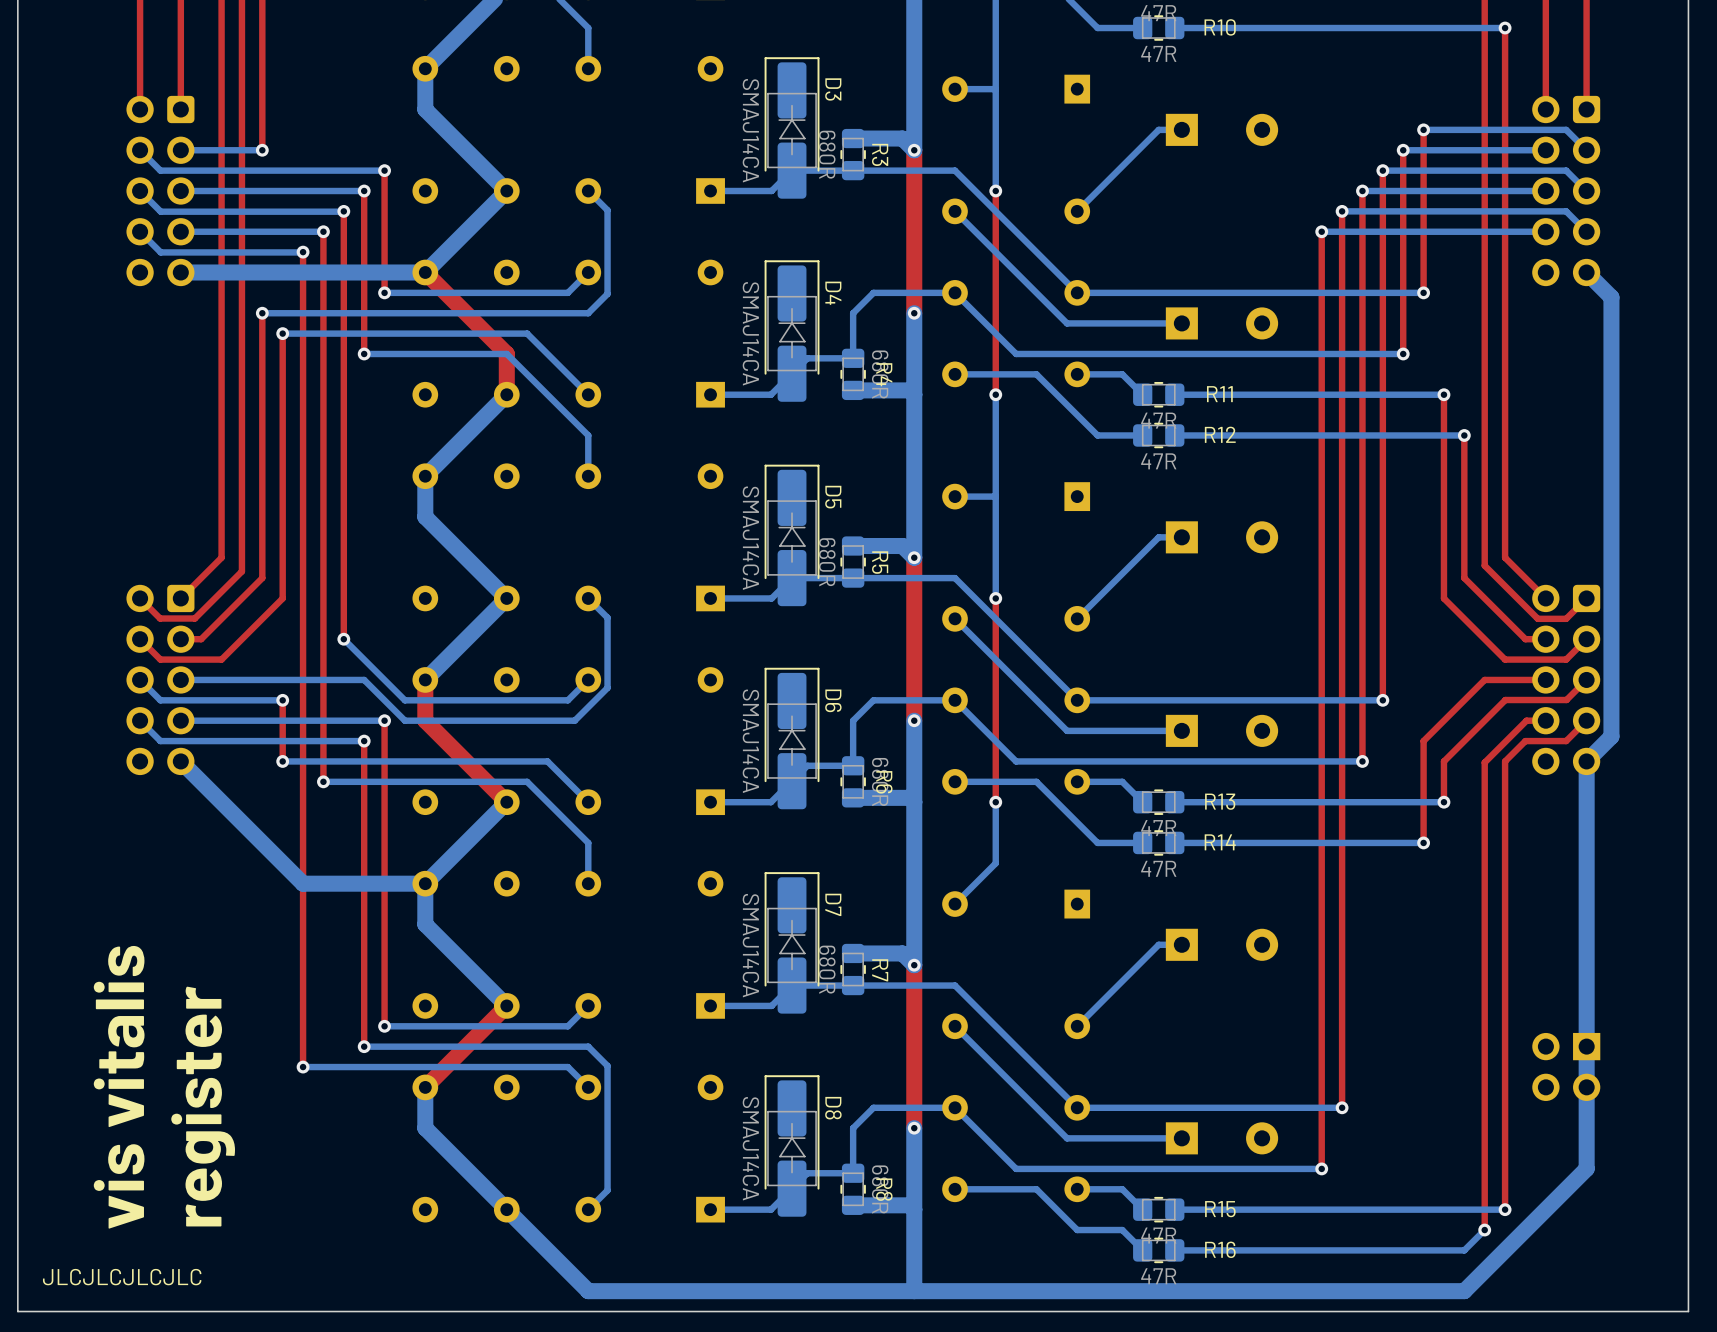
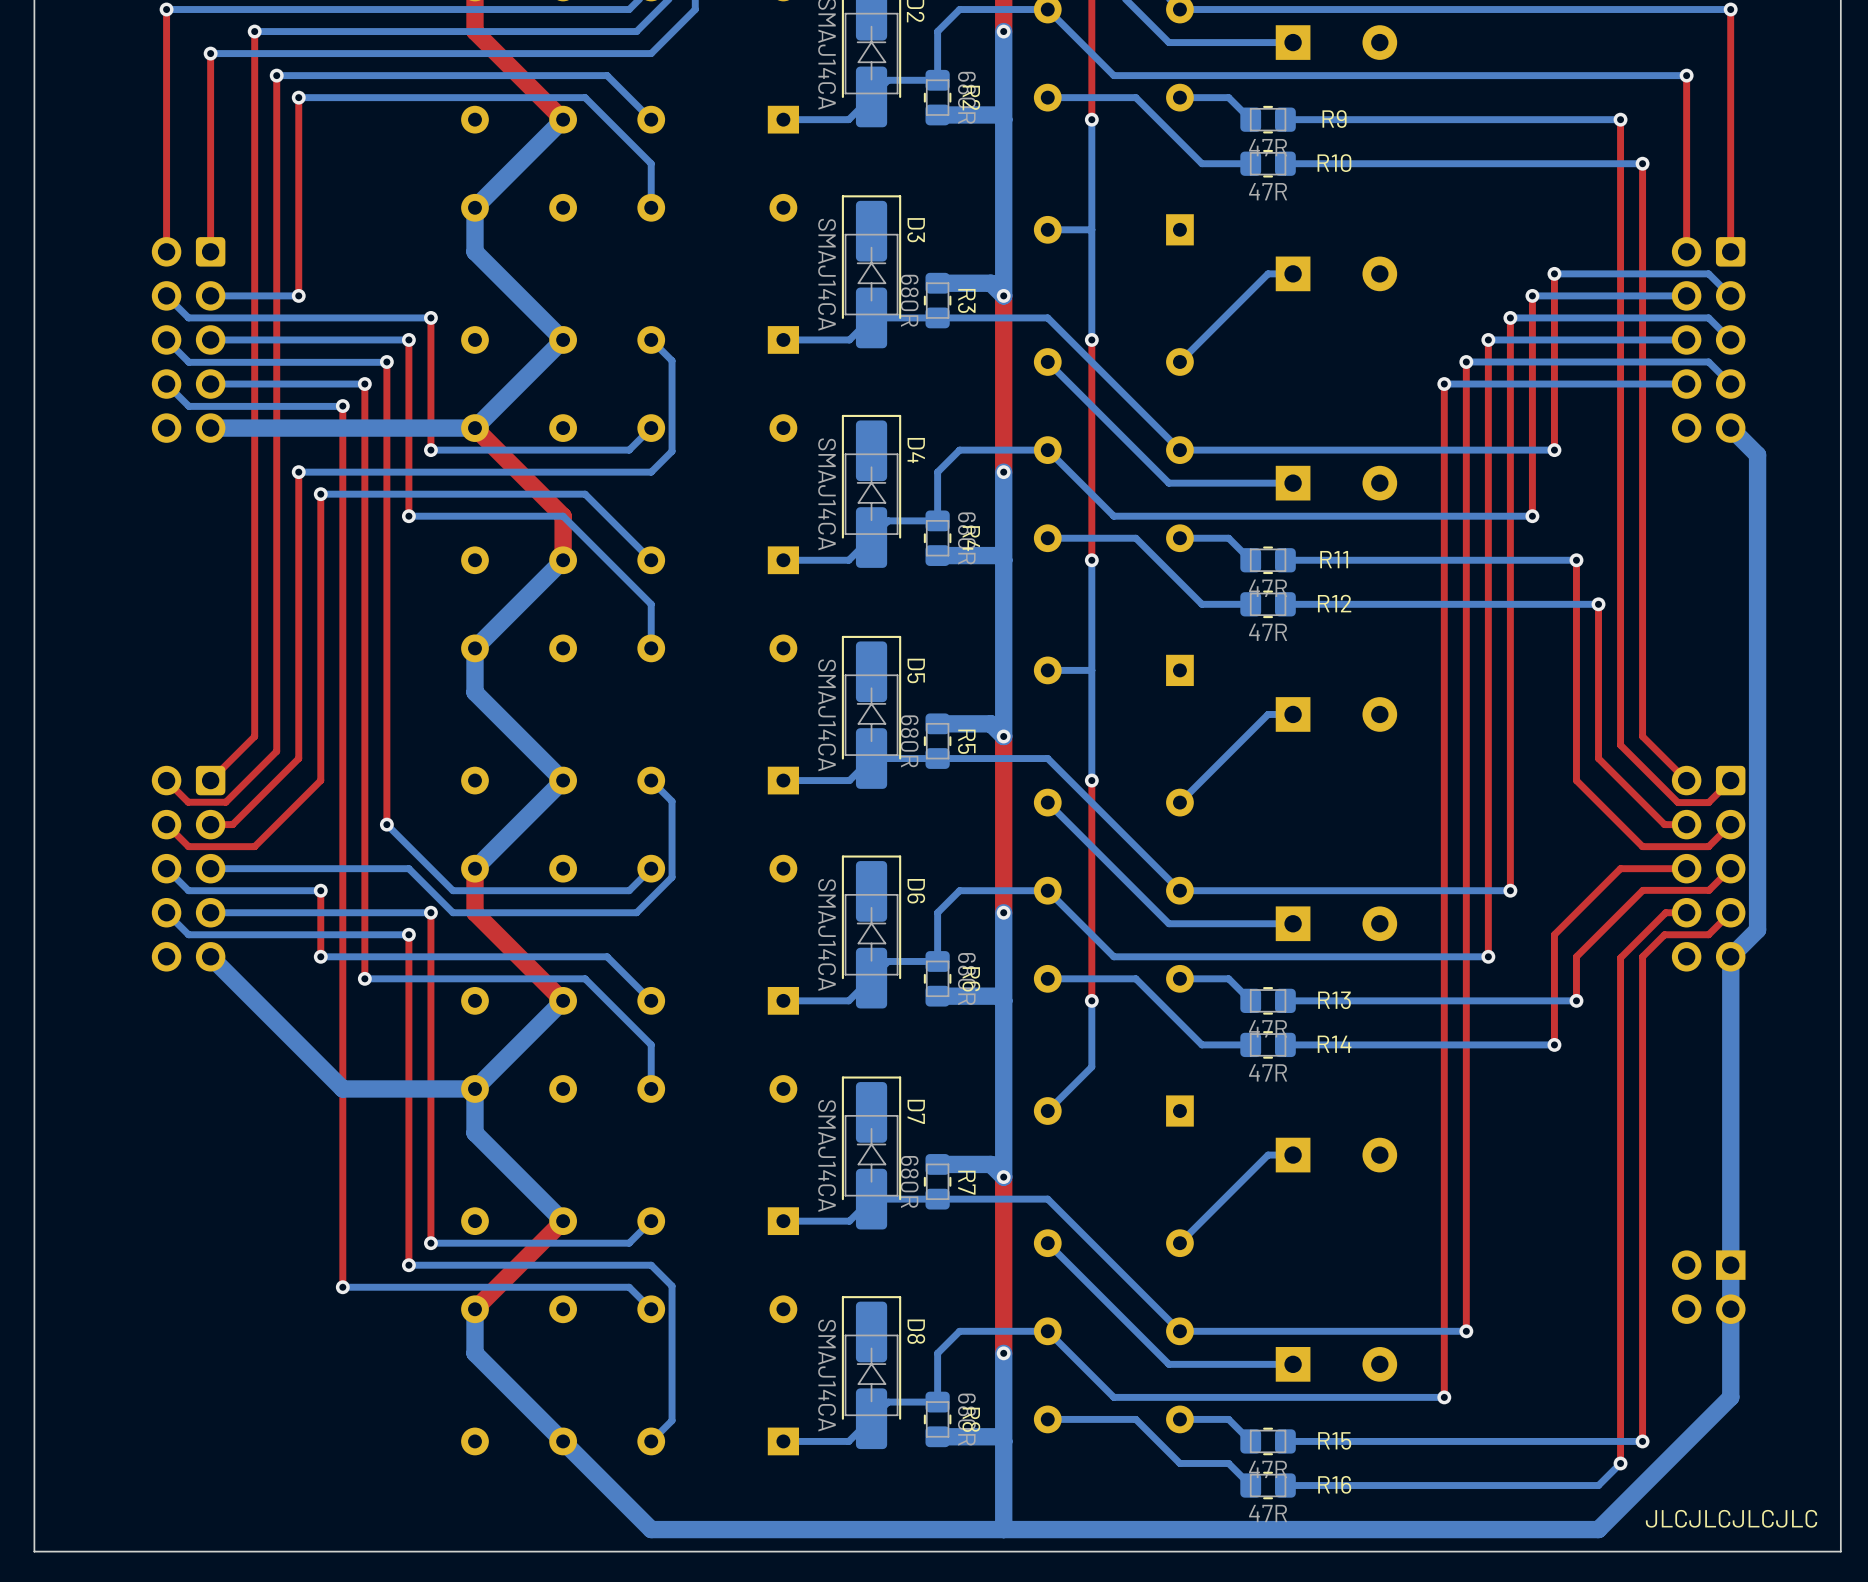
text: vis vitalis (119, 1087) -> none
text: register (203, 1106) -> none
text: JLCJLCJLCJLC (122, 1277) -> none
text: none -> JLCJLCJLCJLC (1731, 1518)

